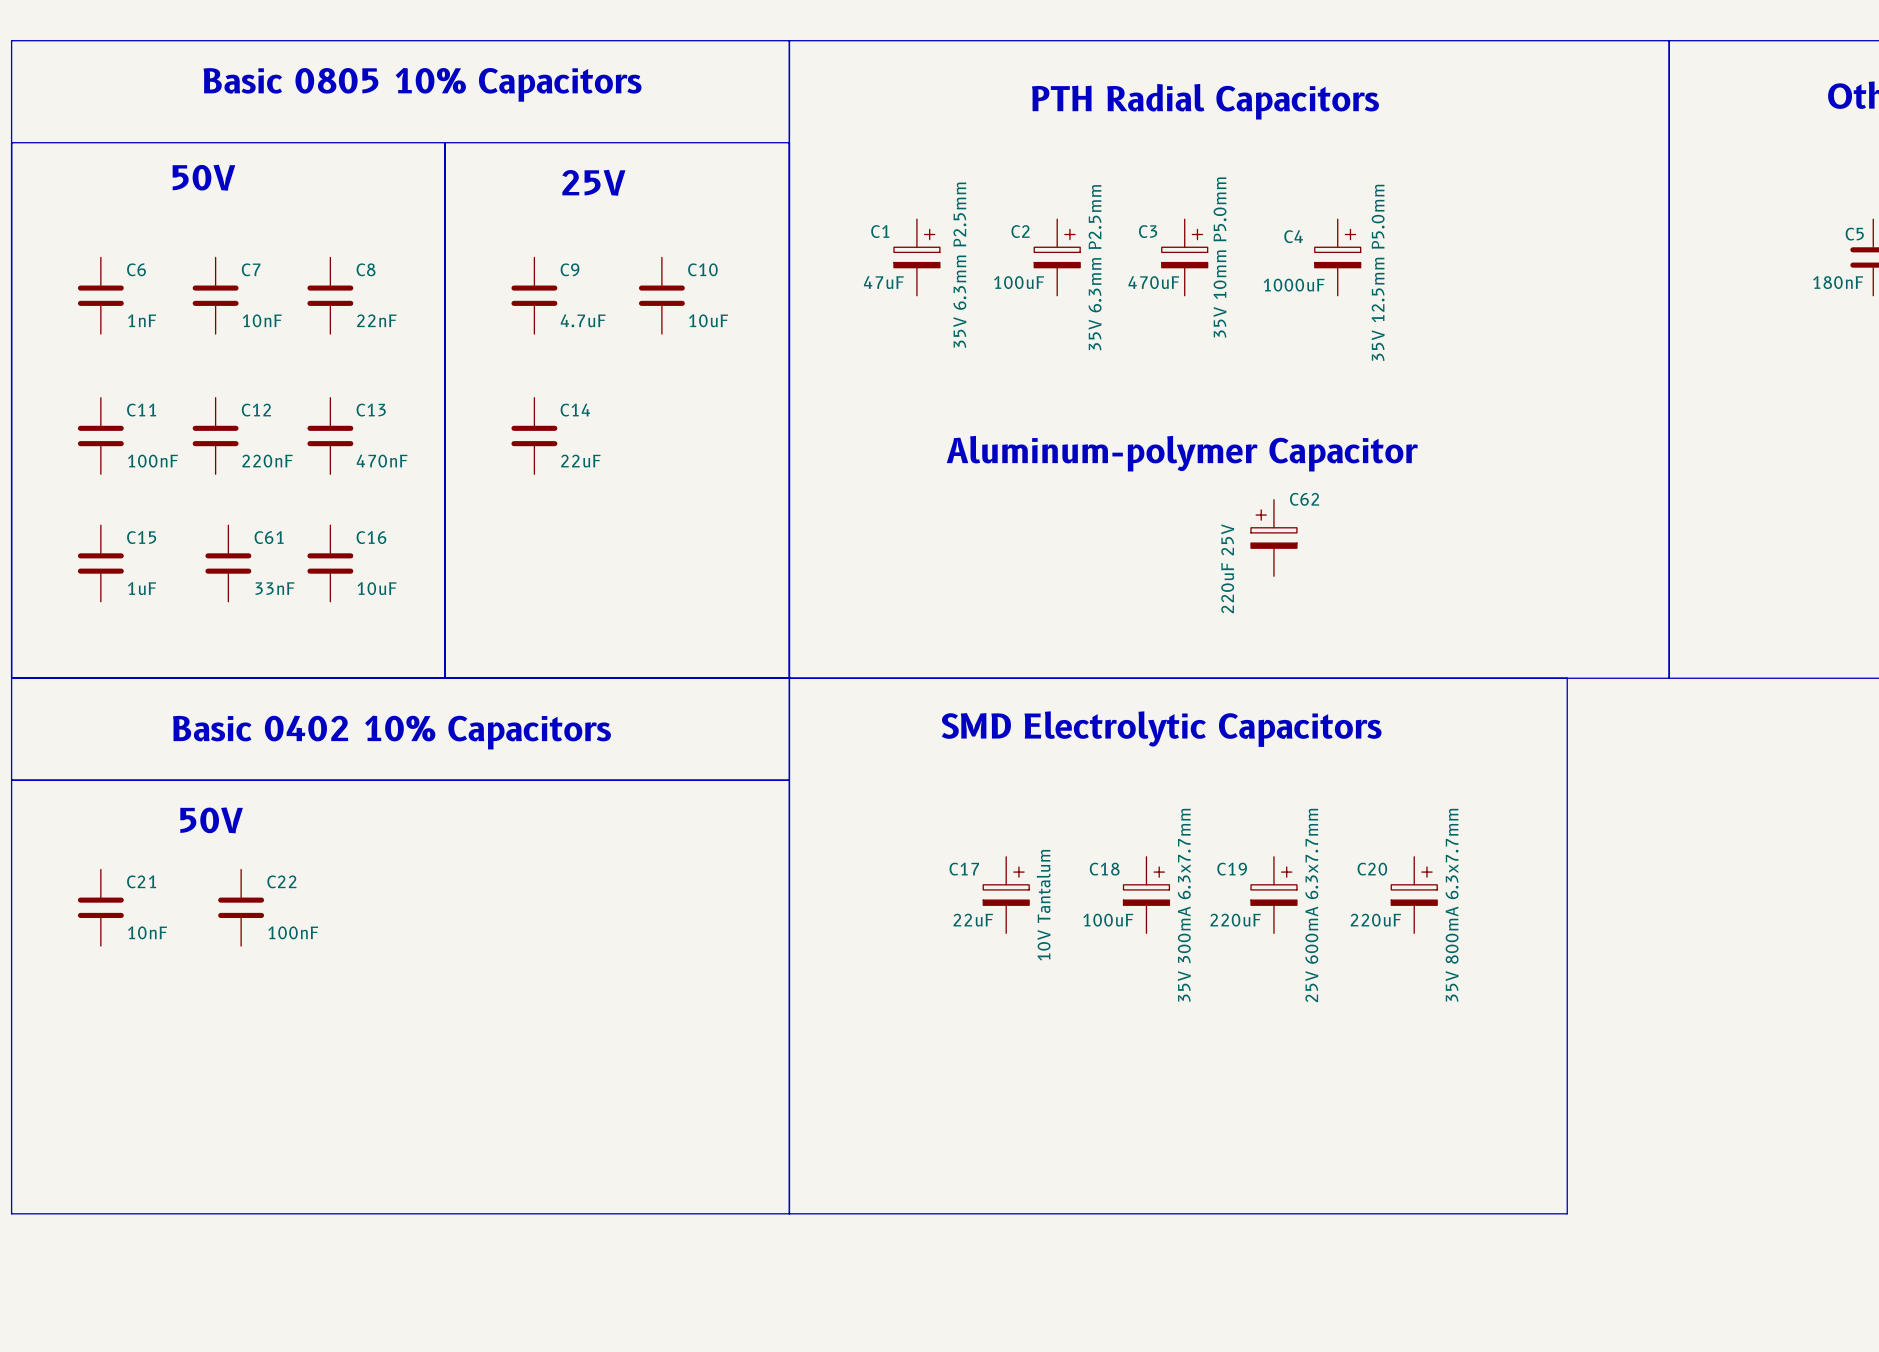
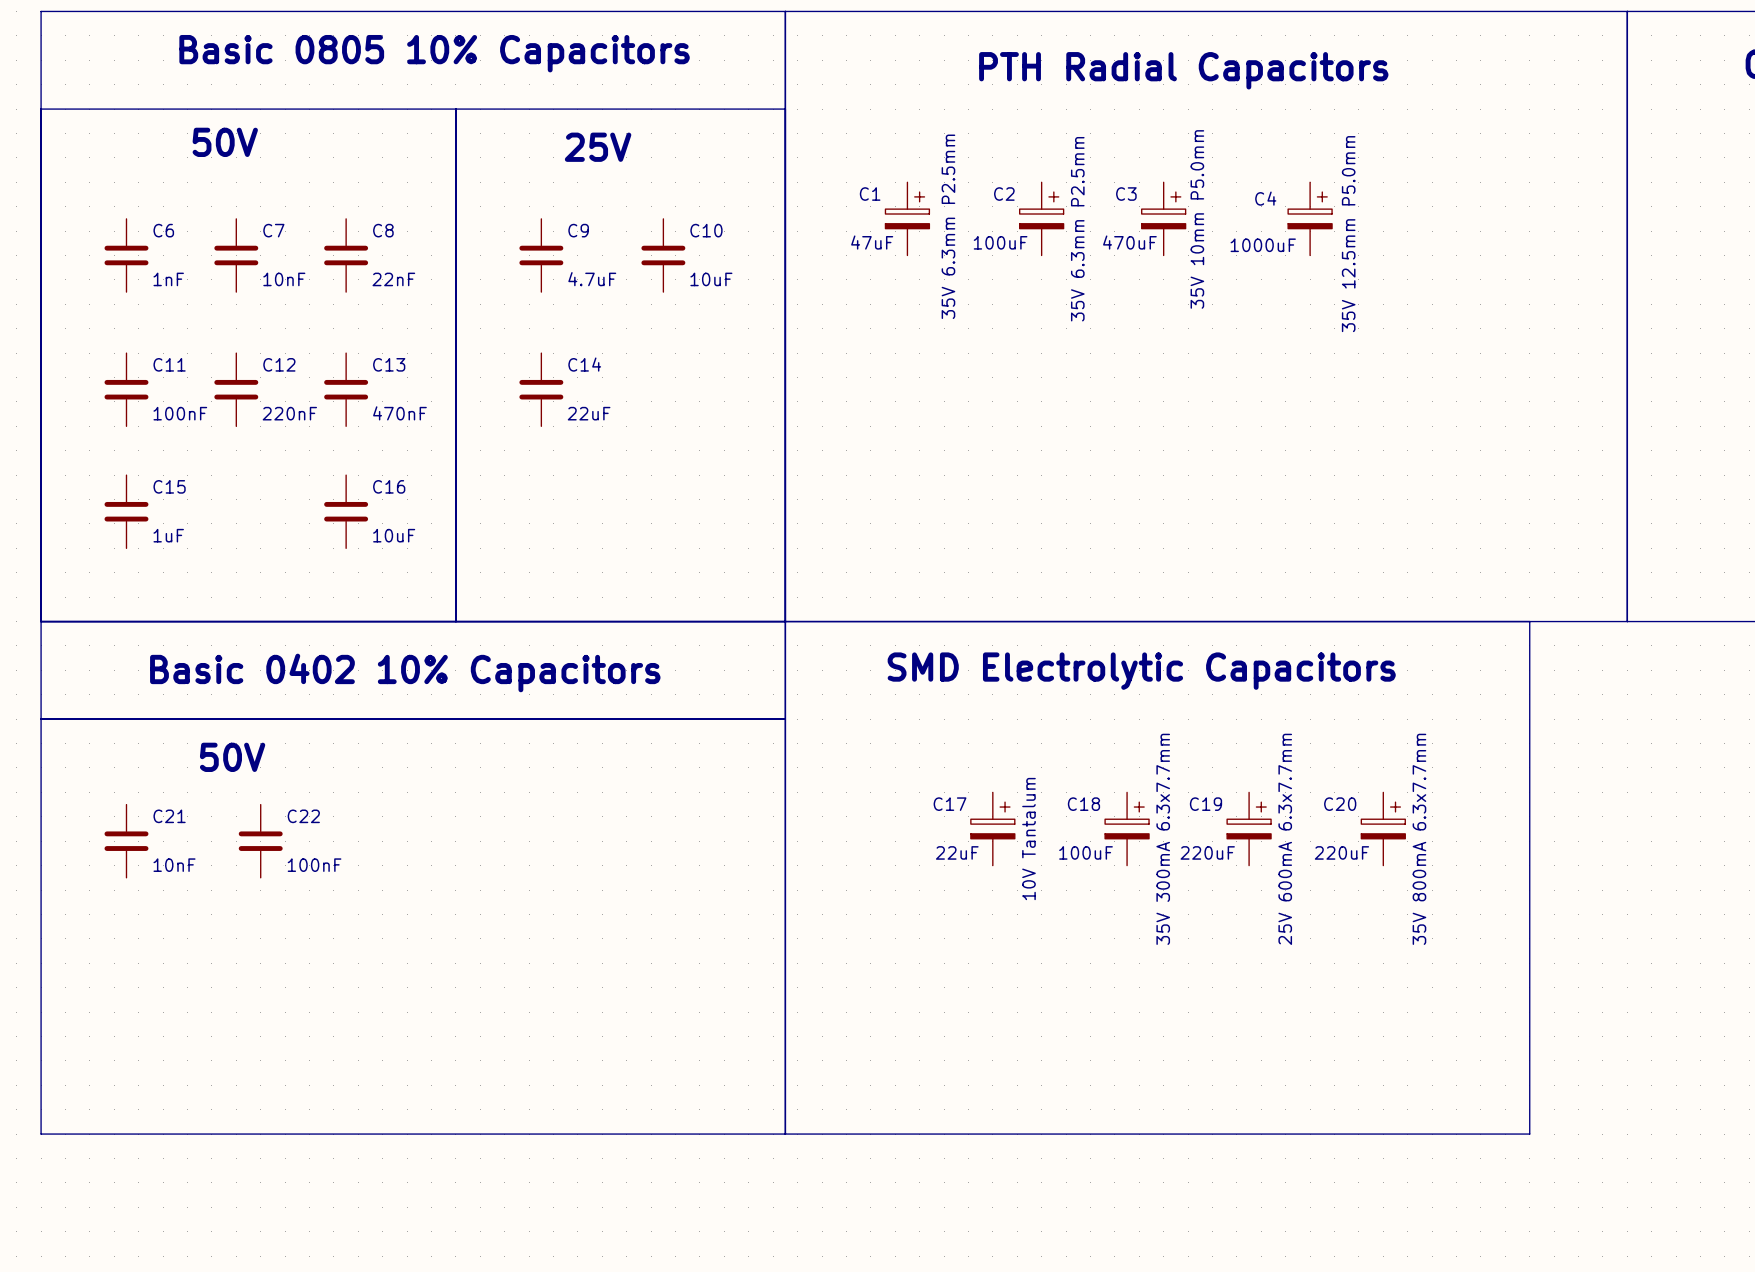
text: Aluminum-polymer Capacitor (1182, 453) -> none
C62: 220uF 25V (1273, 537) -> none
C61: 33nF (228, 563) -> none

